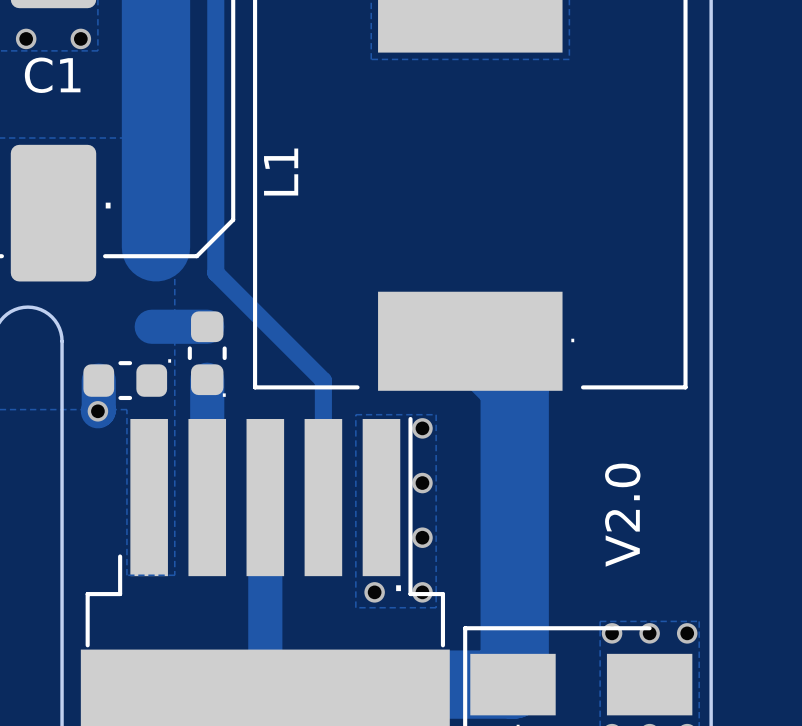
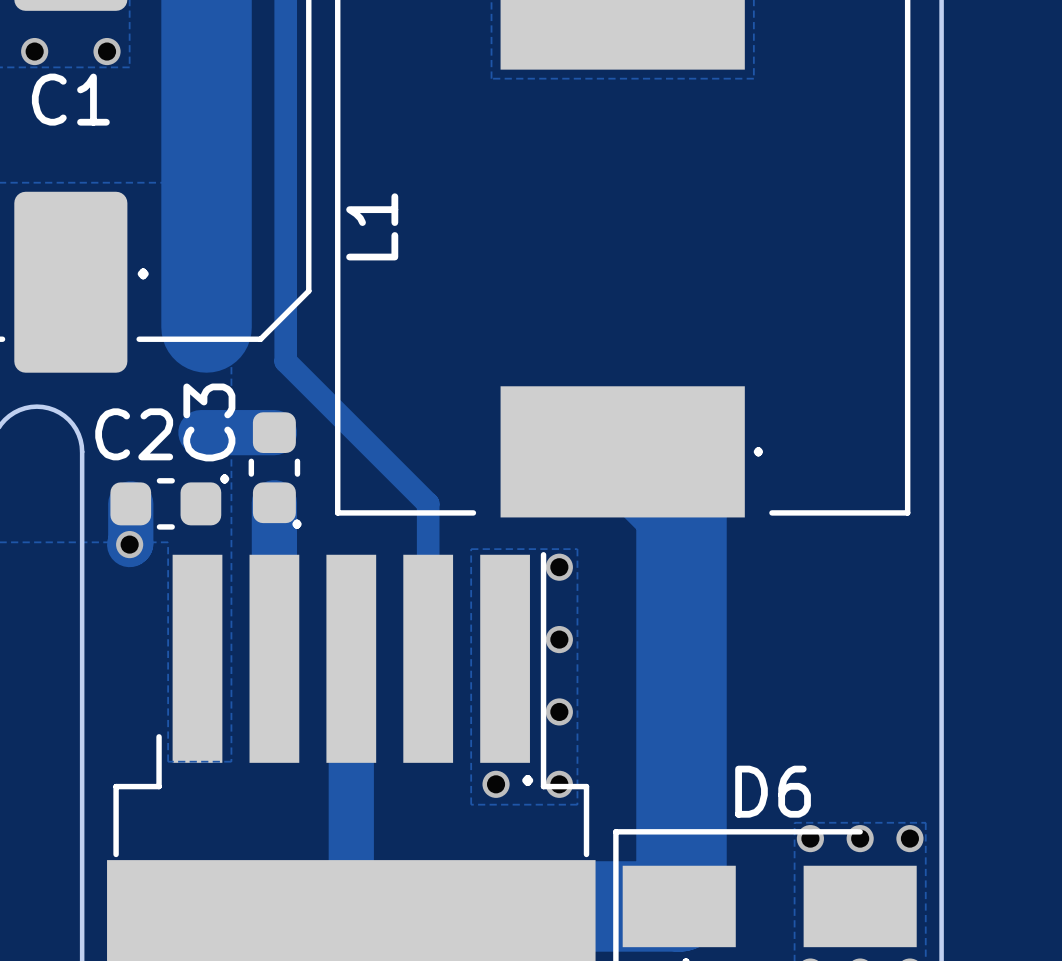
C3 name: none -> C3 (209, 422)
C2 name: none -> C2 (134, 434)
text: V2.0 (622, 515) -> none
D6 name: none -> D6 (773, 791)

